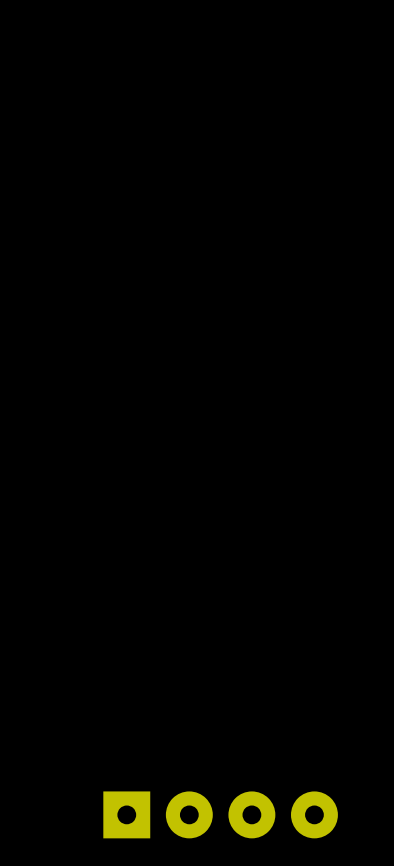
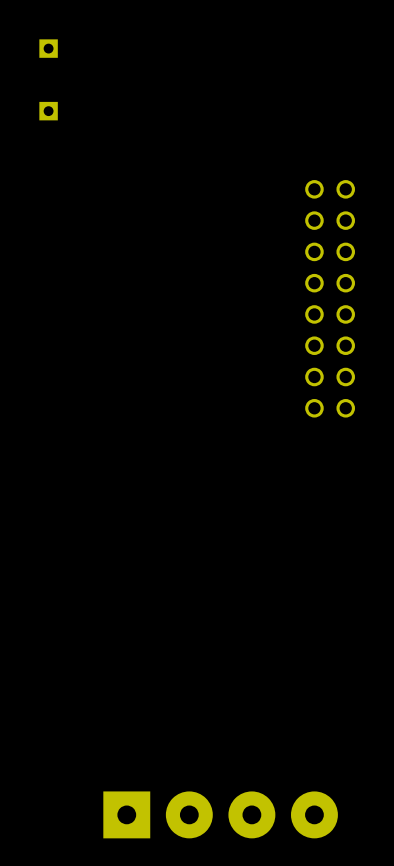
part: none -> (48, 48)
part: none -> (48, 111)
part: none -> (330, 298)

